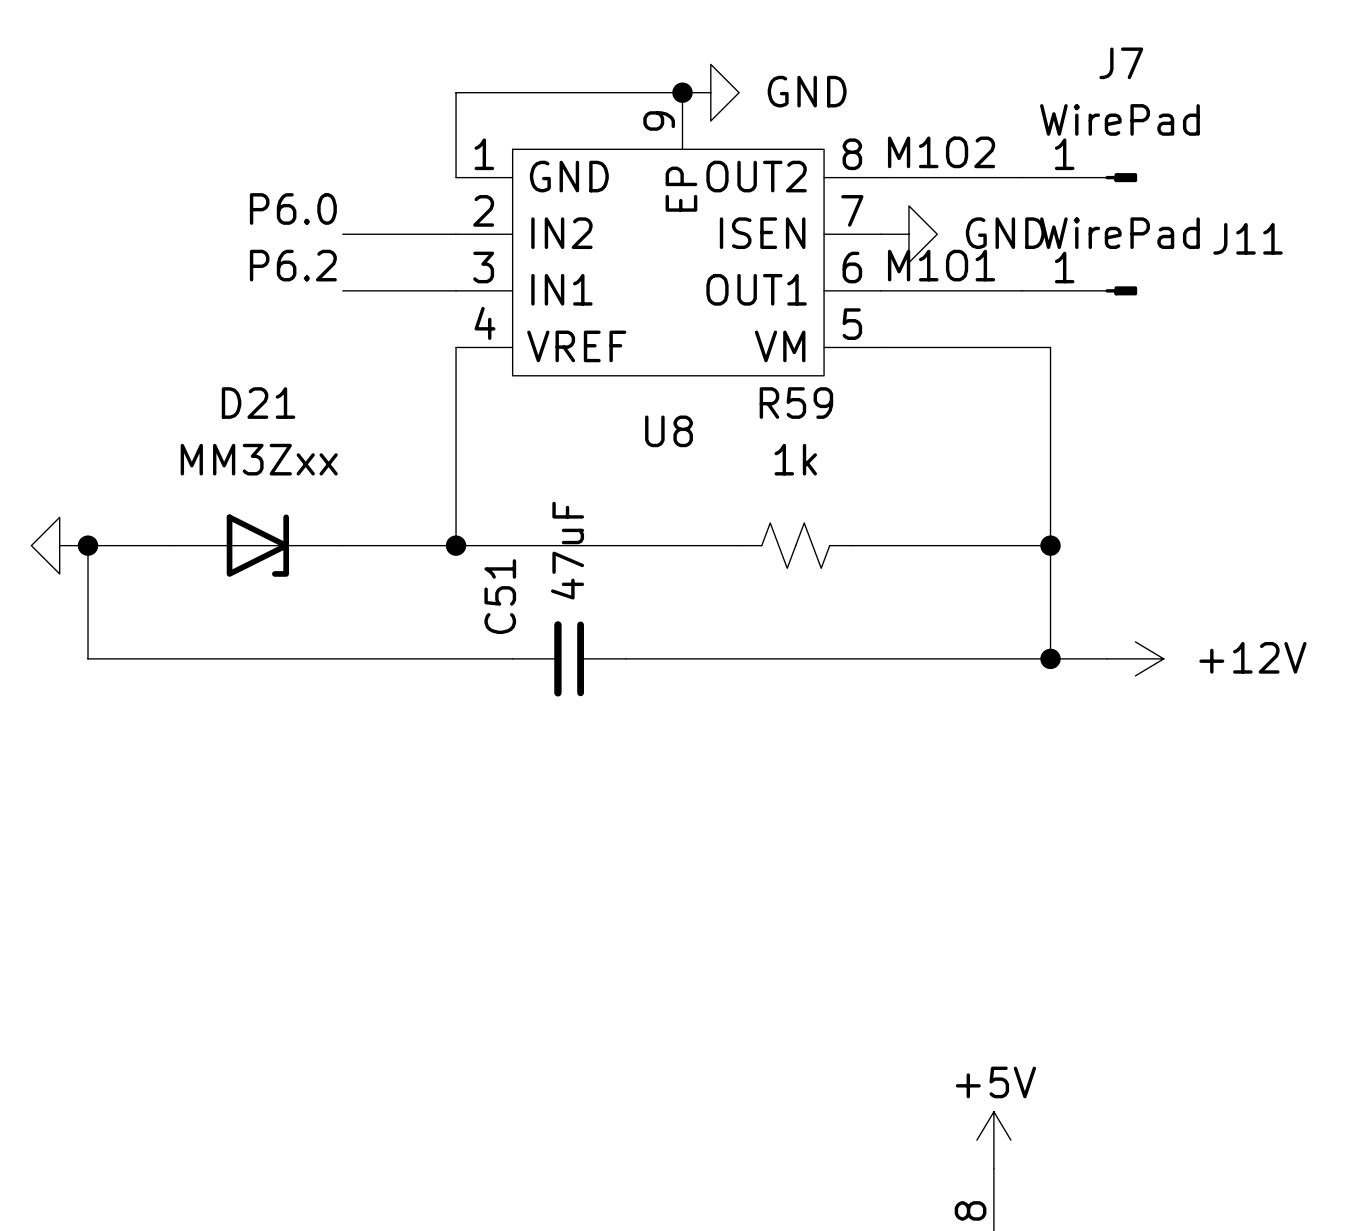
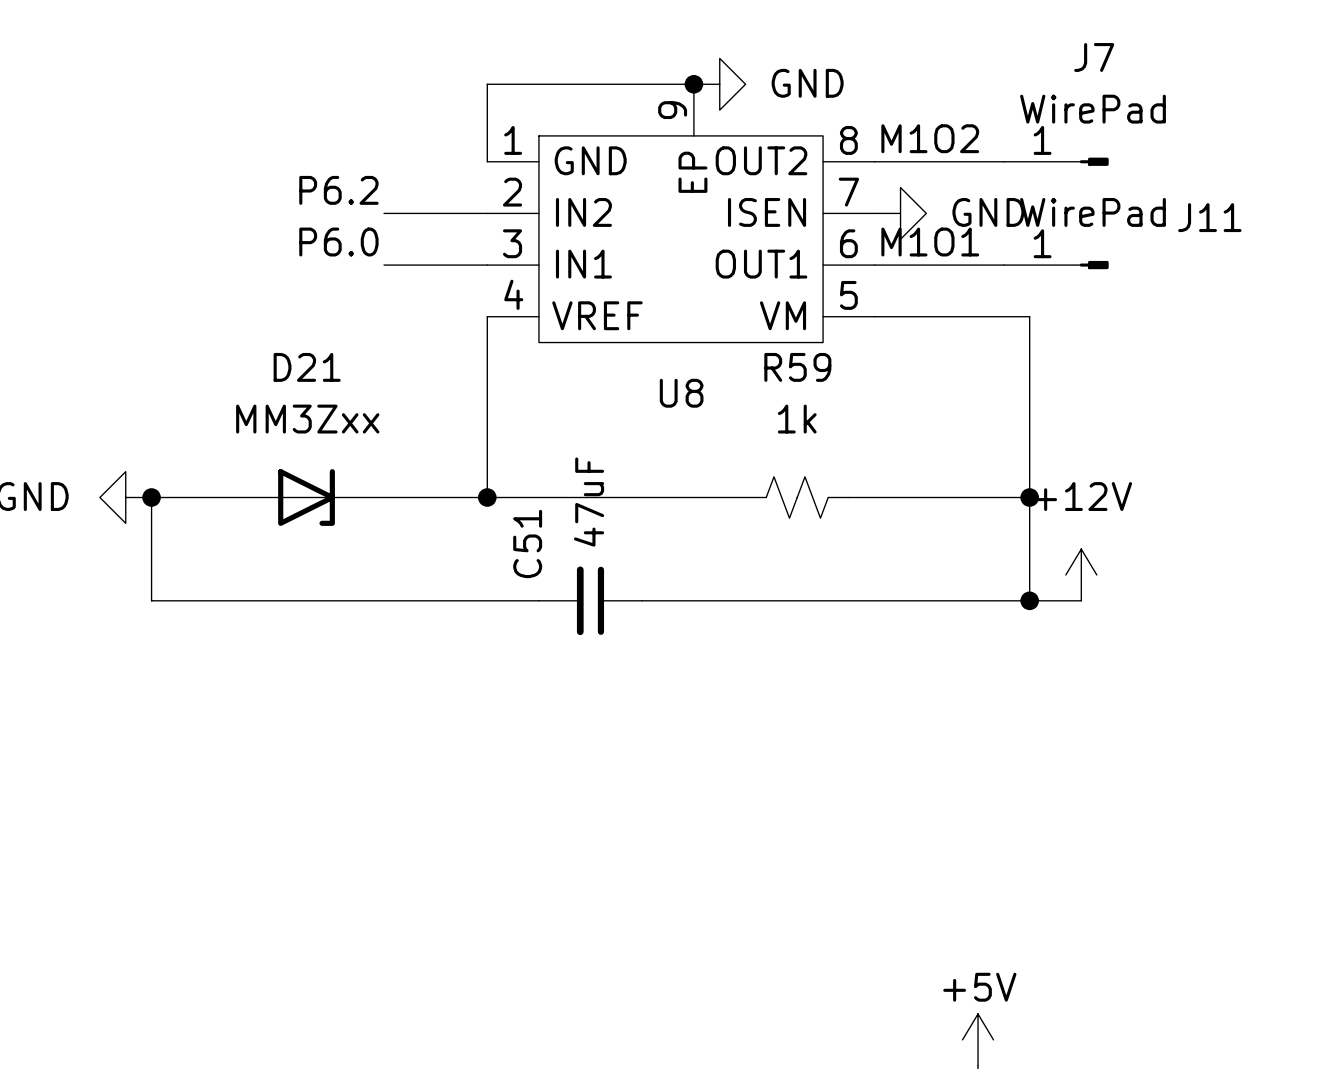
label: P6.0 (293, 208) -> P6.2 (338, 190)
label: P6.2 (293, 265) -> P6.0 (338, 242)
power symbol rotation: 0° (1135, 658) -> 90° counterclockwise (1081, 574)
power symbol position: +12V (1135, 658) -> +12V (1081, 574)

